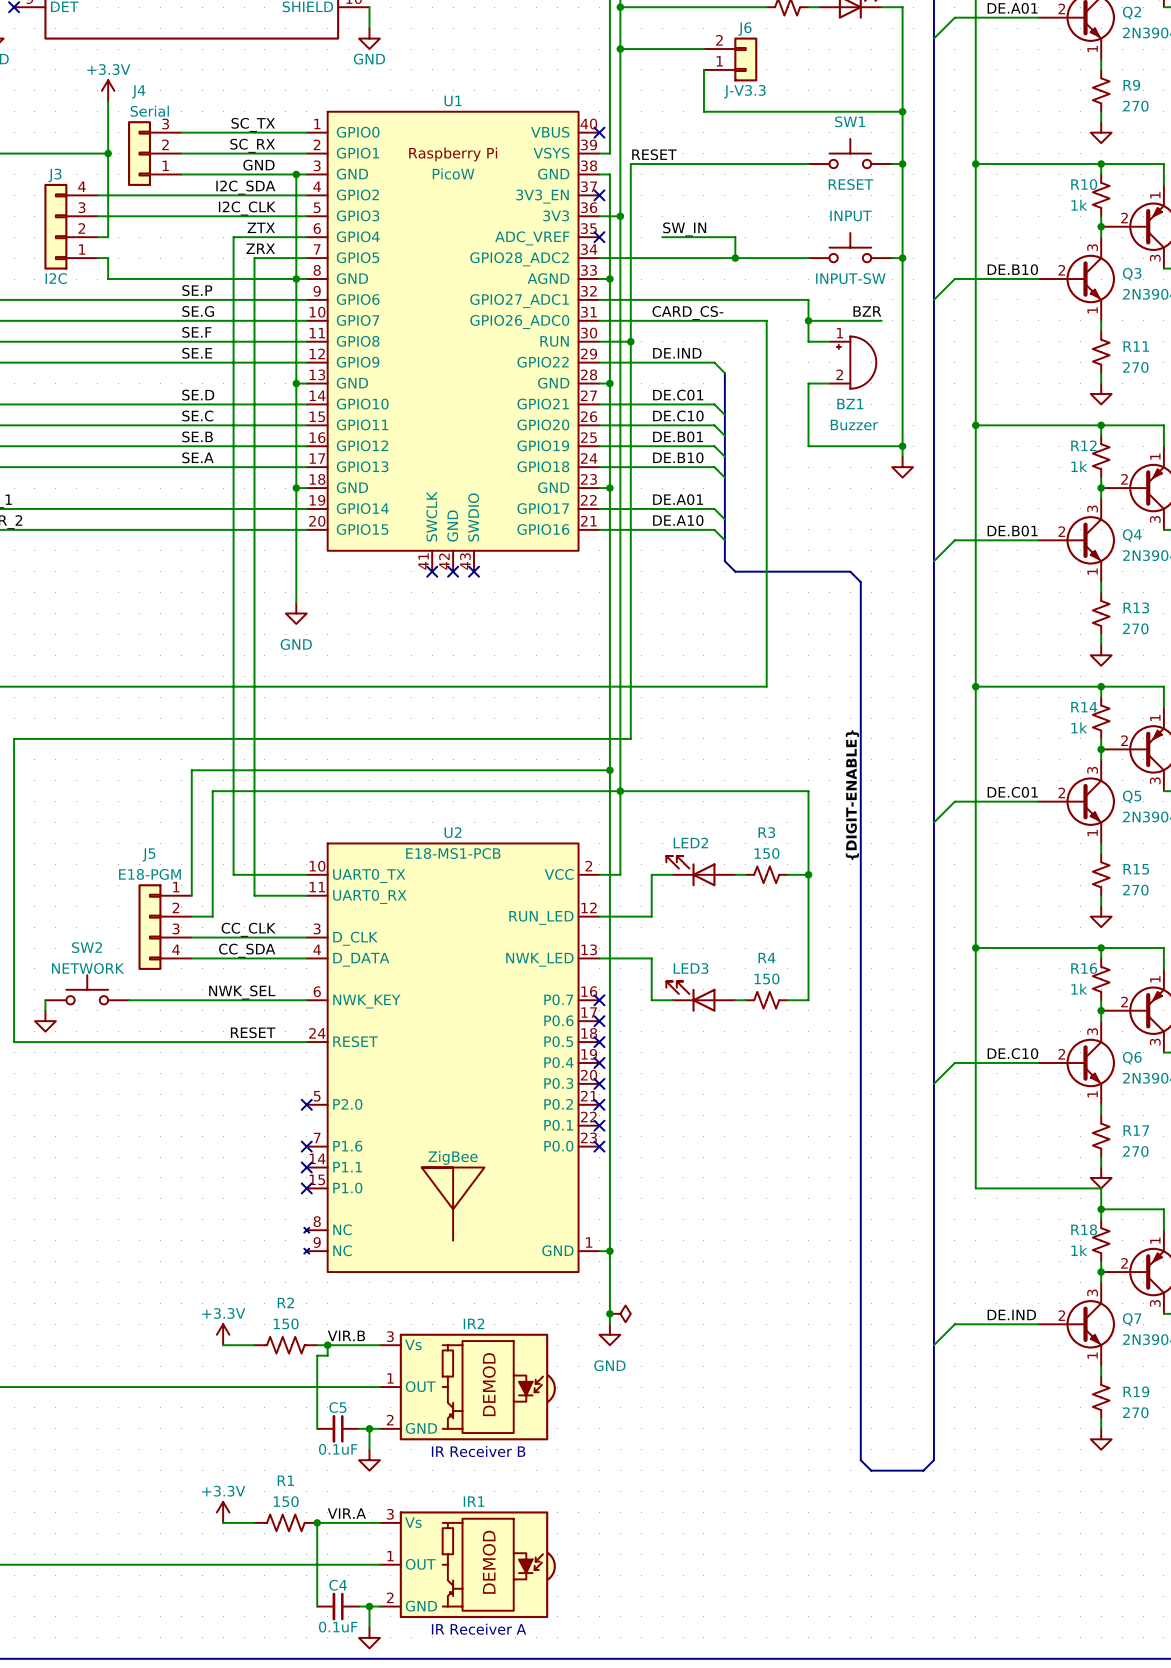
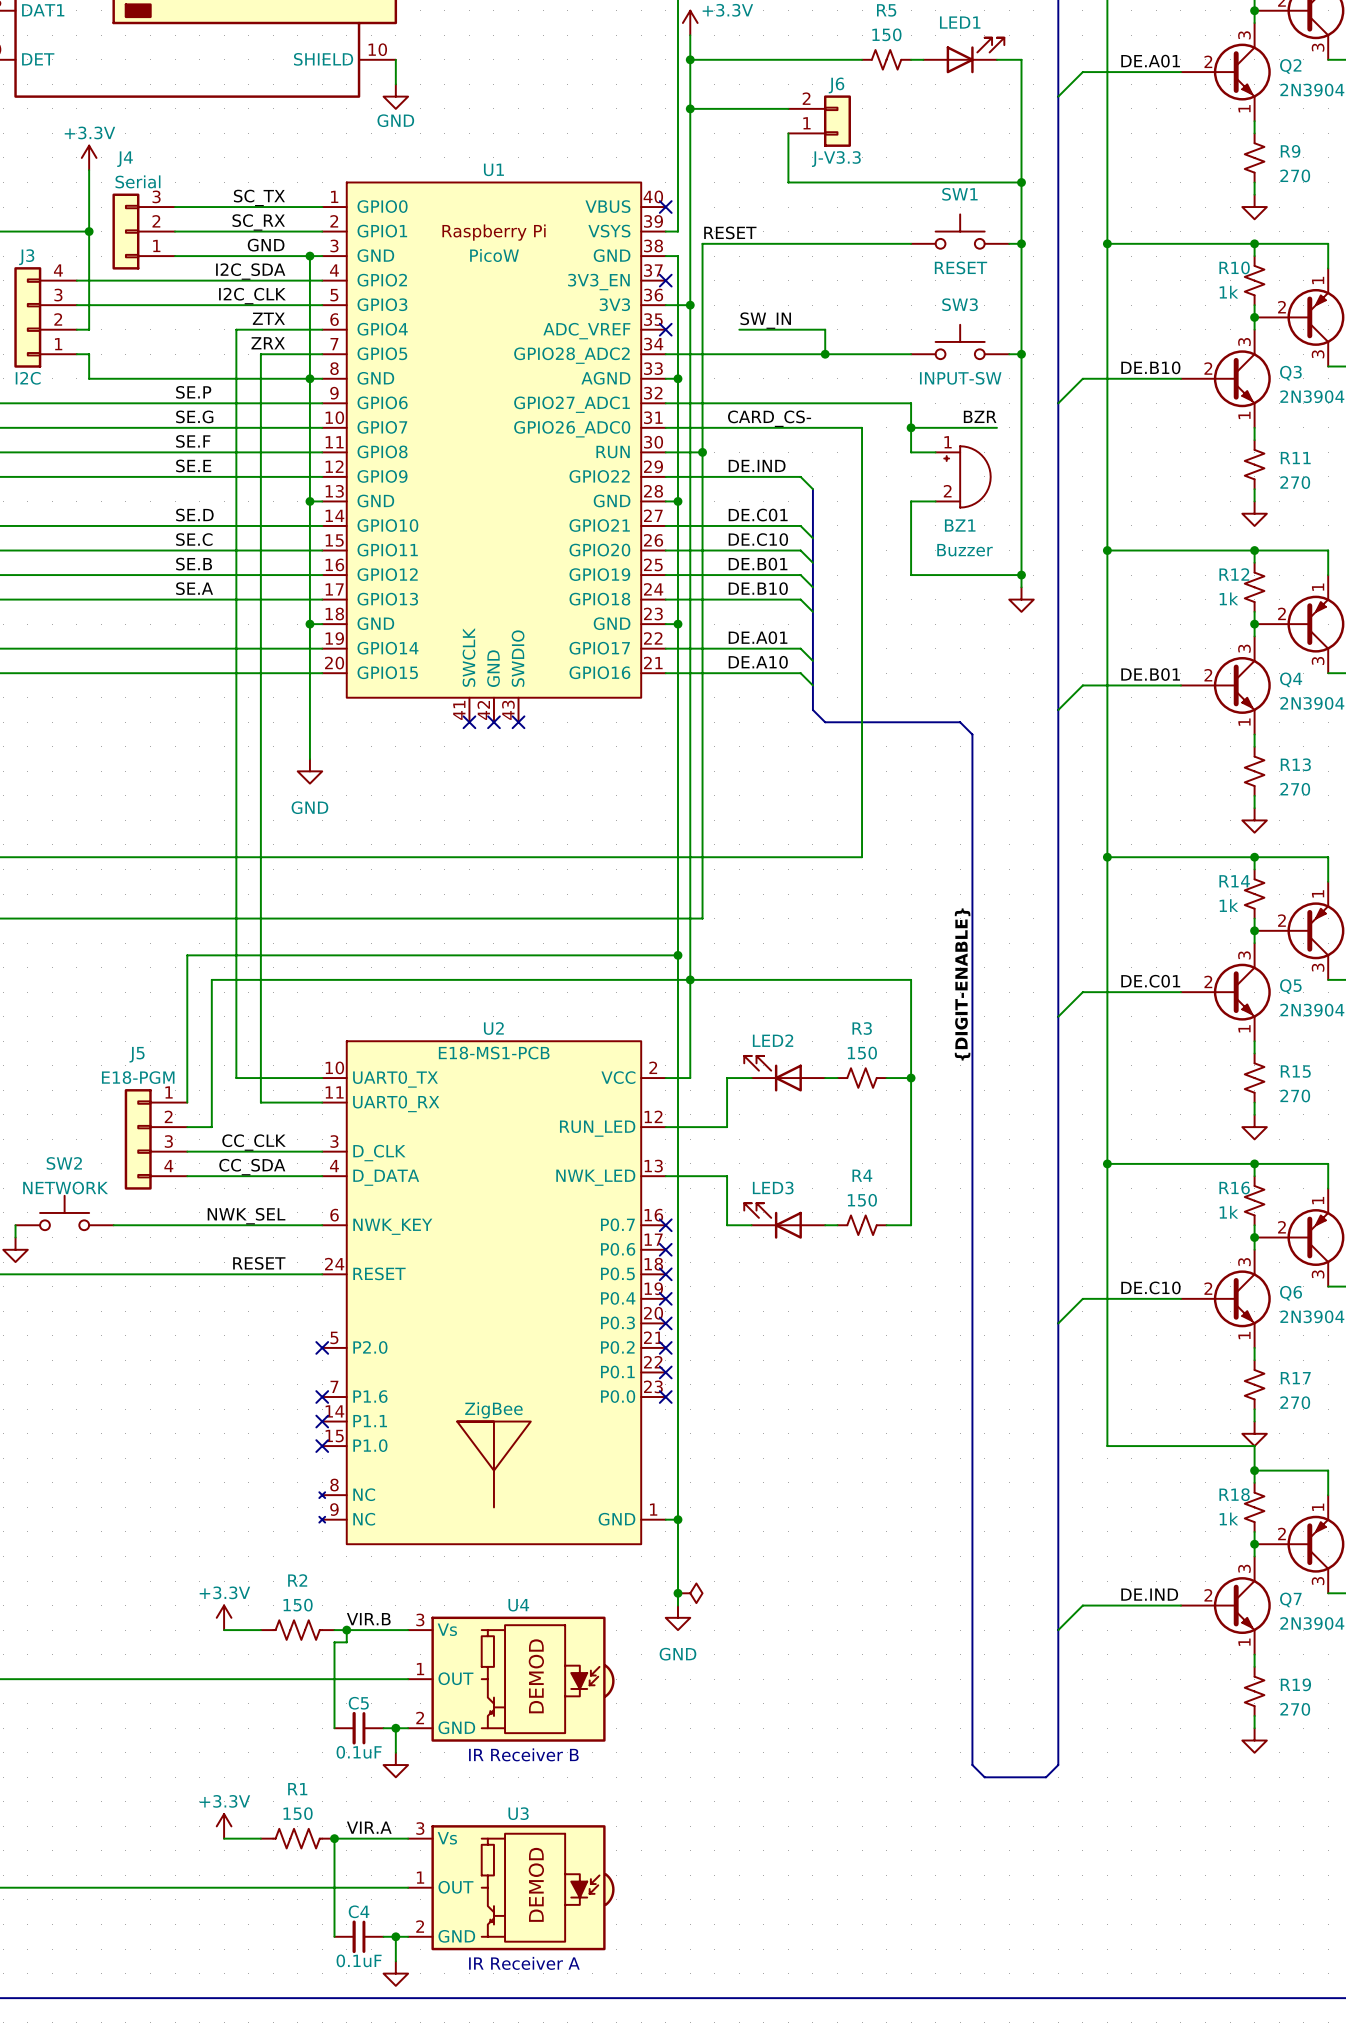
INPUT name: INPUT (851, 215) -> SW3 (960, 304)
IR2 name: IR2 (474, 1323) -> U4 (518, 1605)
IR1 name: IR1 (474, 1501) -> U3 (518, 1813)

